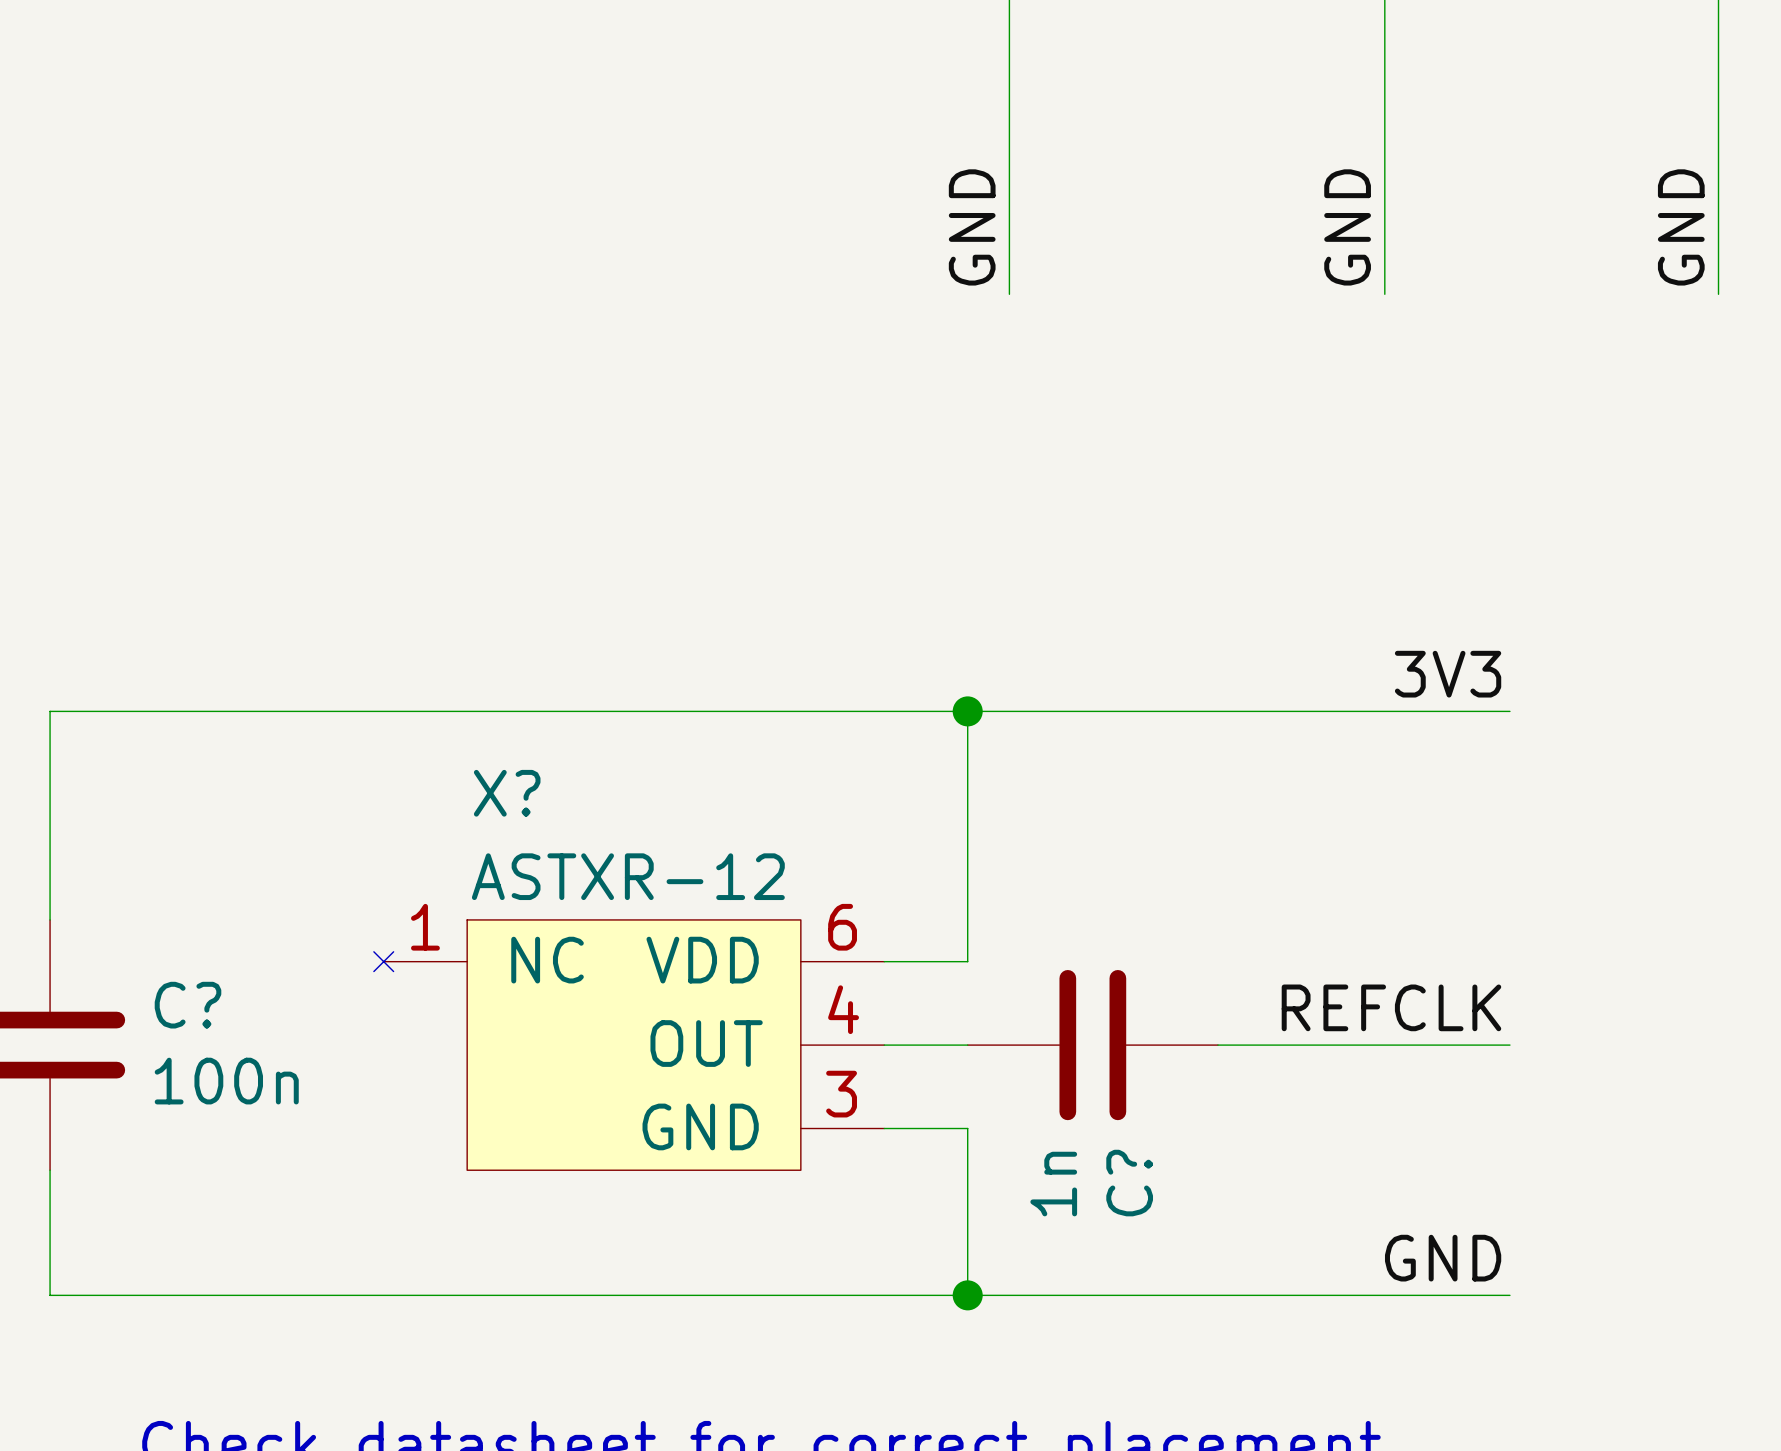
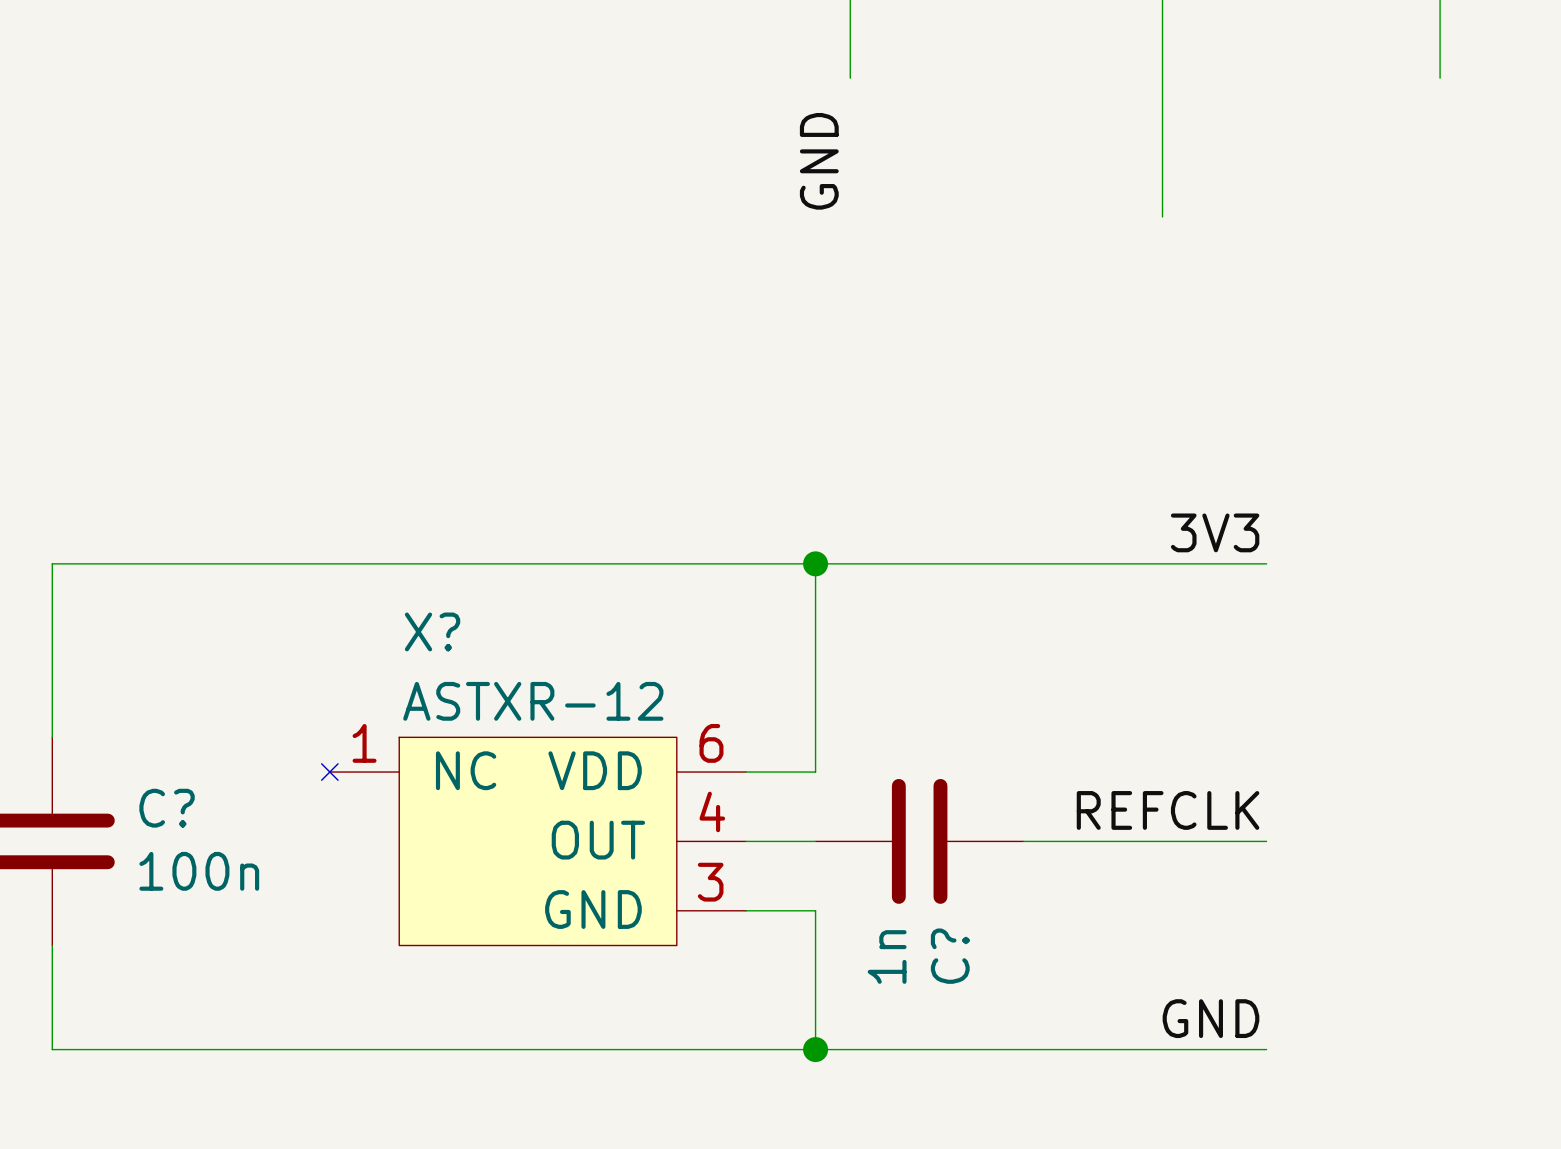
wire: (1009, 127) (1009, 294) -> none
wire: (1718, 127) (1718, 294) -> none
label: GND (1347, 227) -> none
label: GND (1681, 227) -> none

